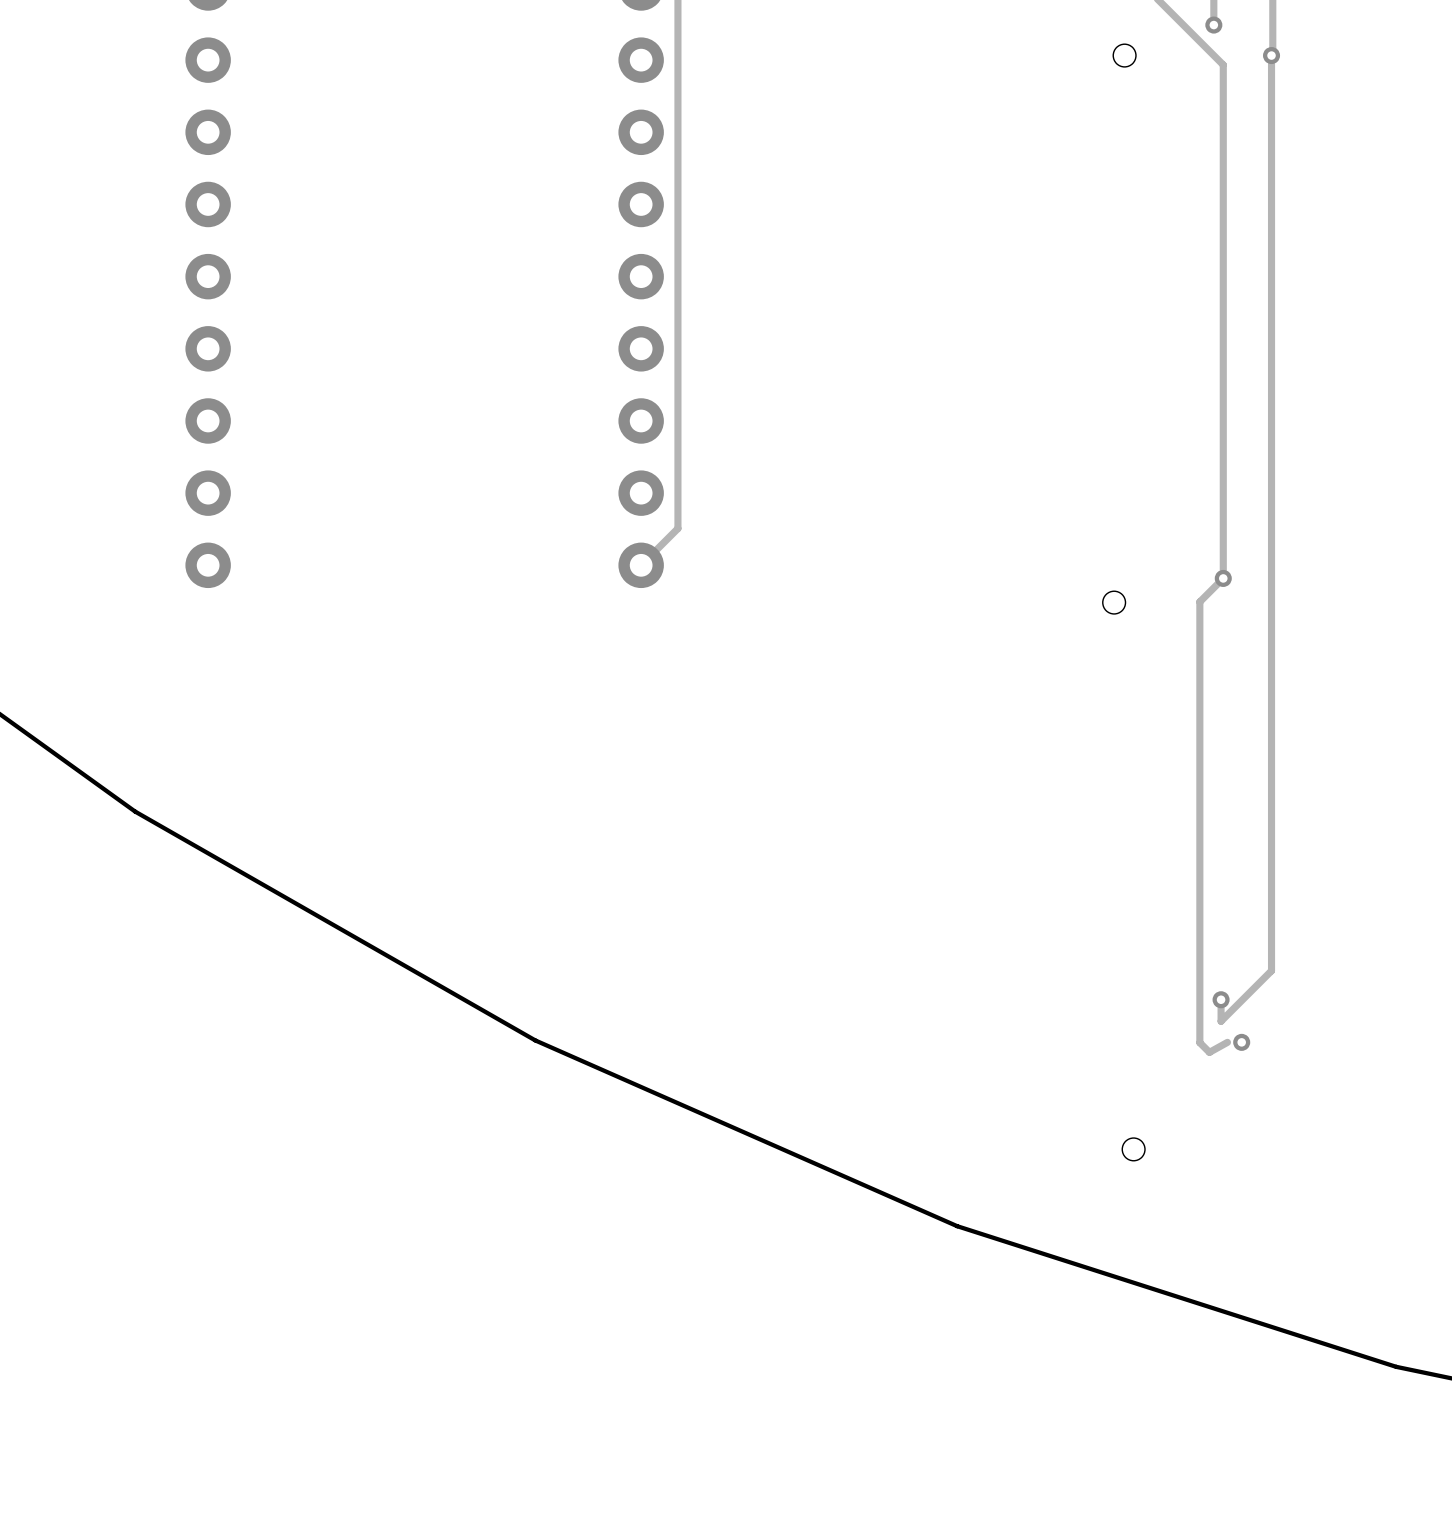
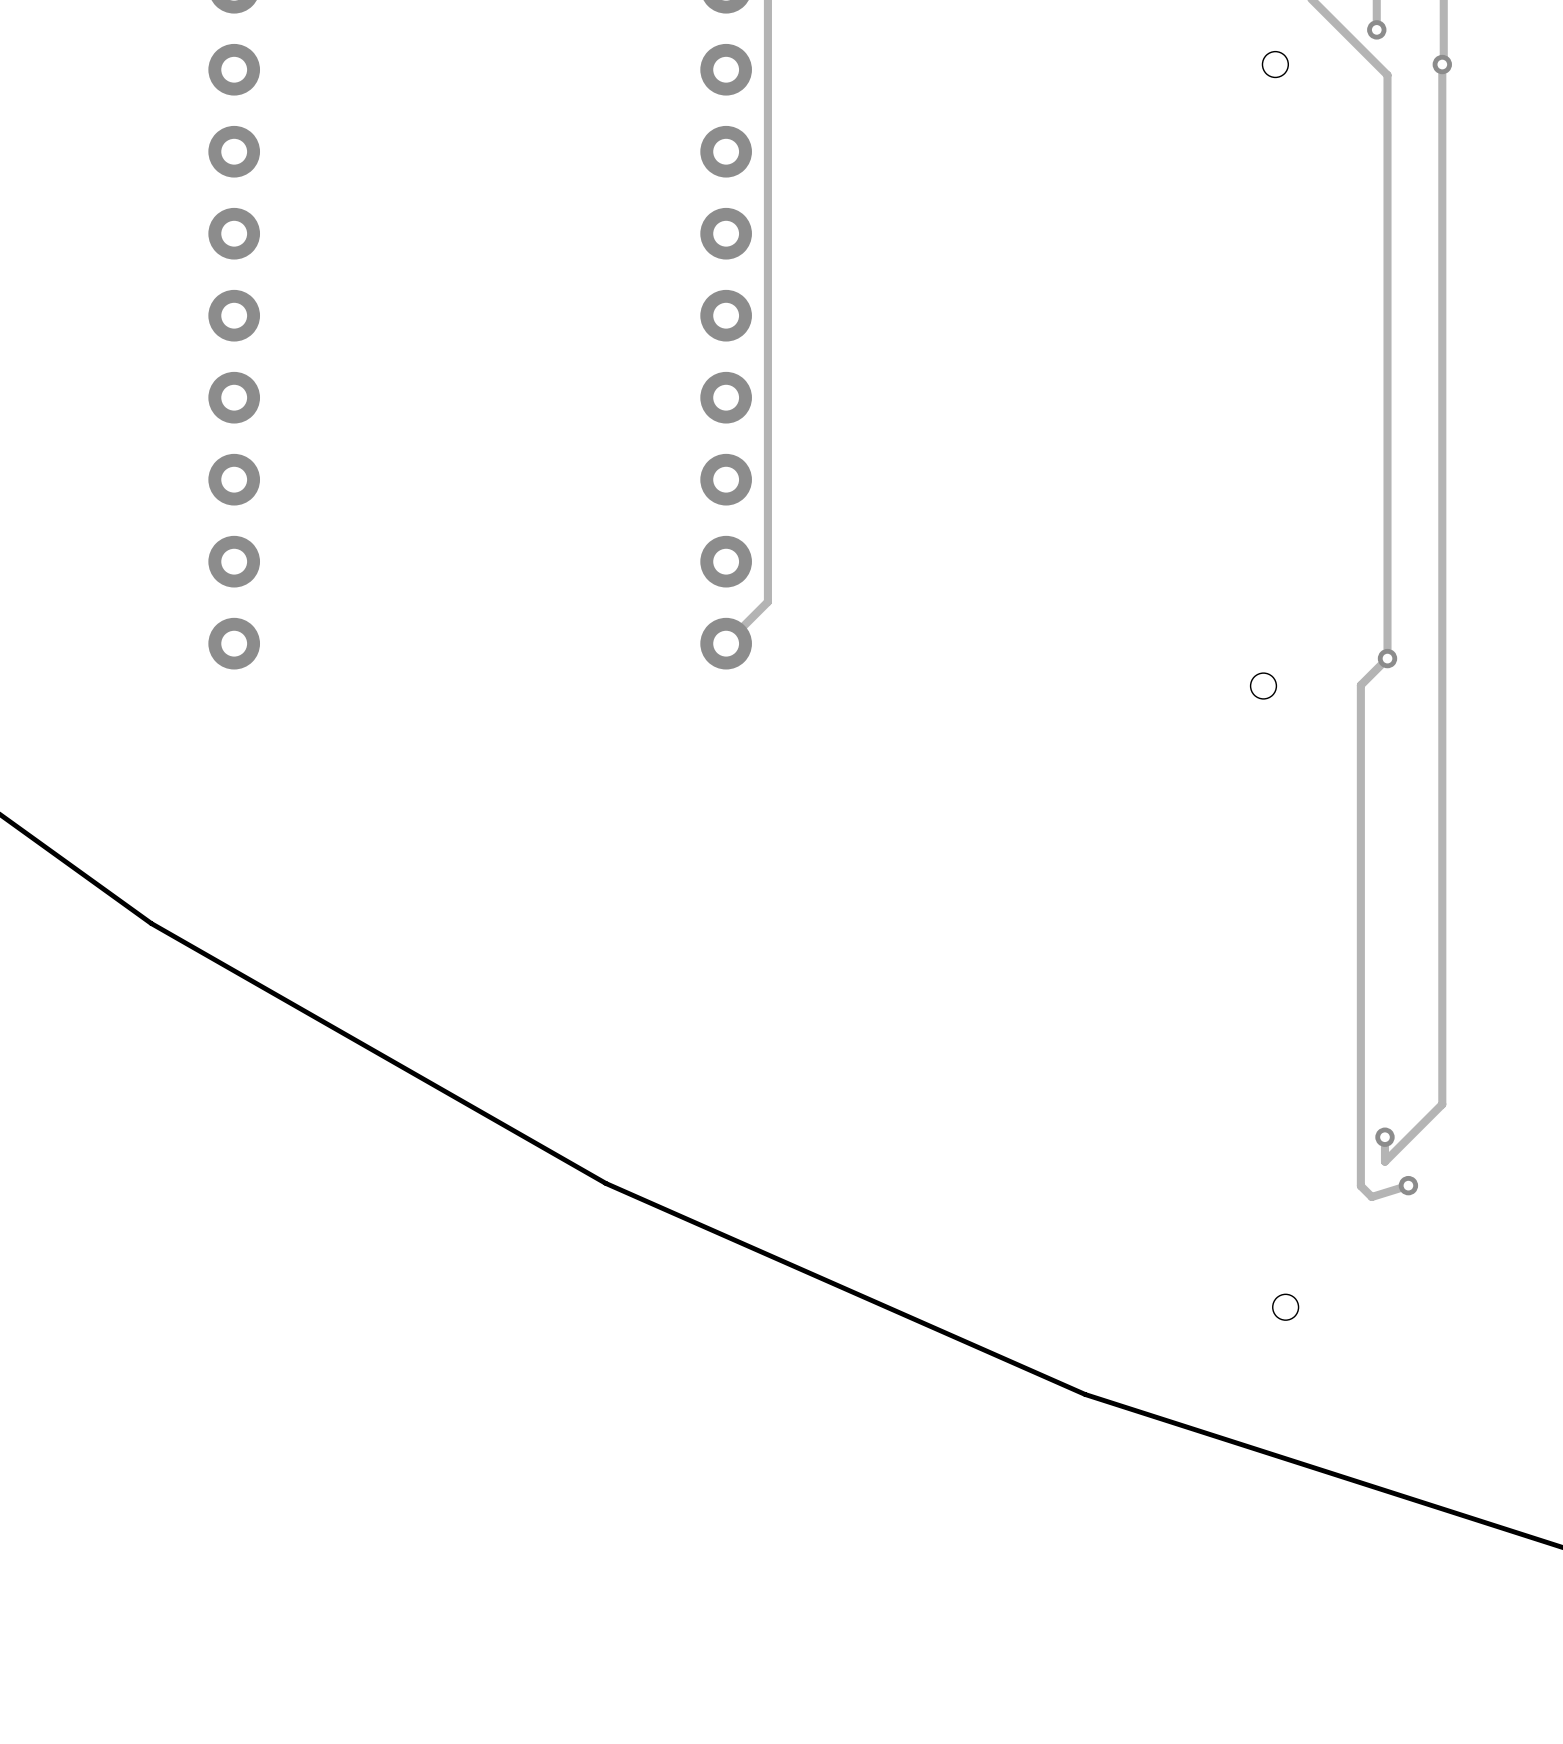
track: (1227, 1042) (1209, 1052) -> (1408, 1185) (1371, 1196)

